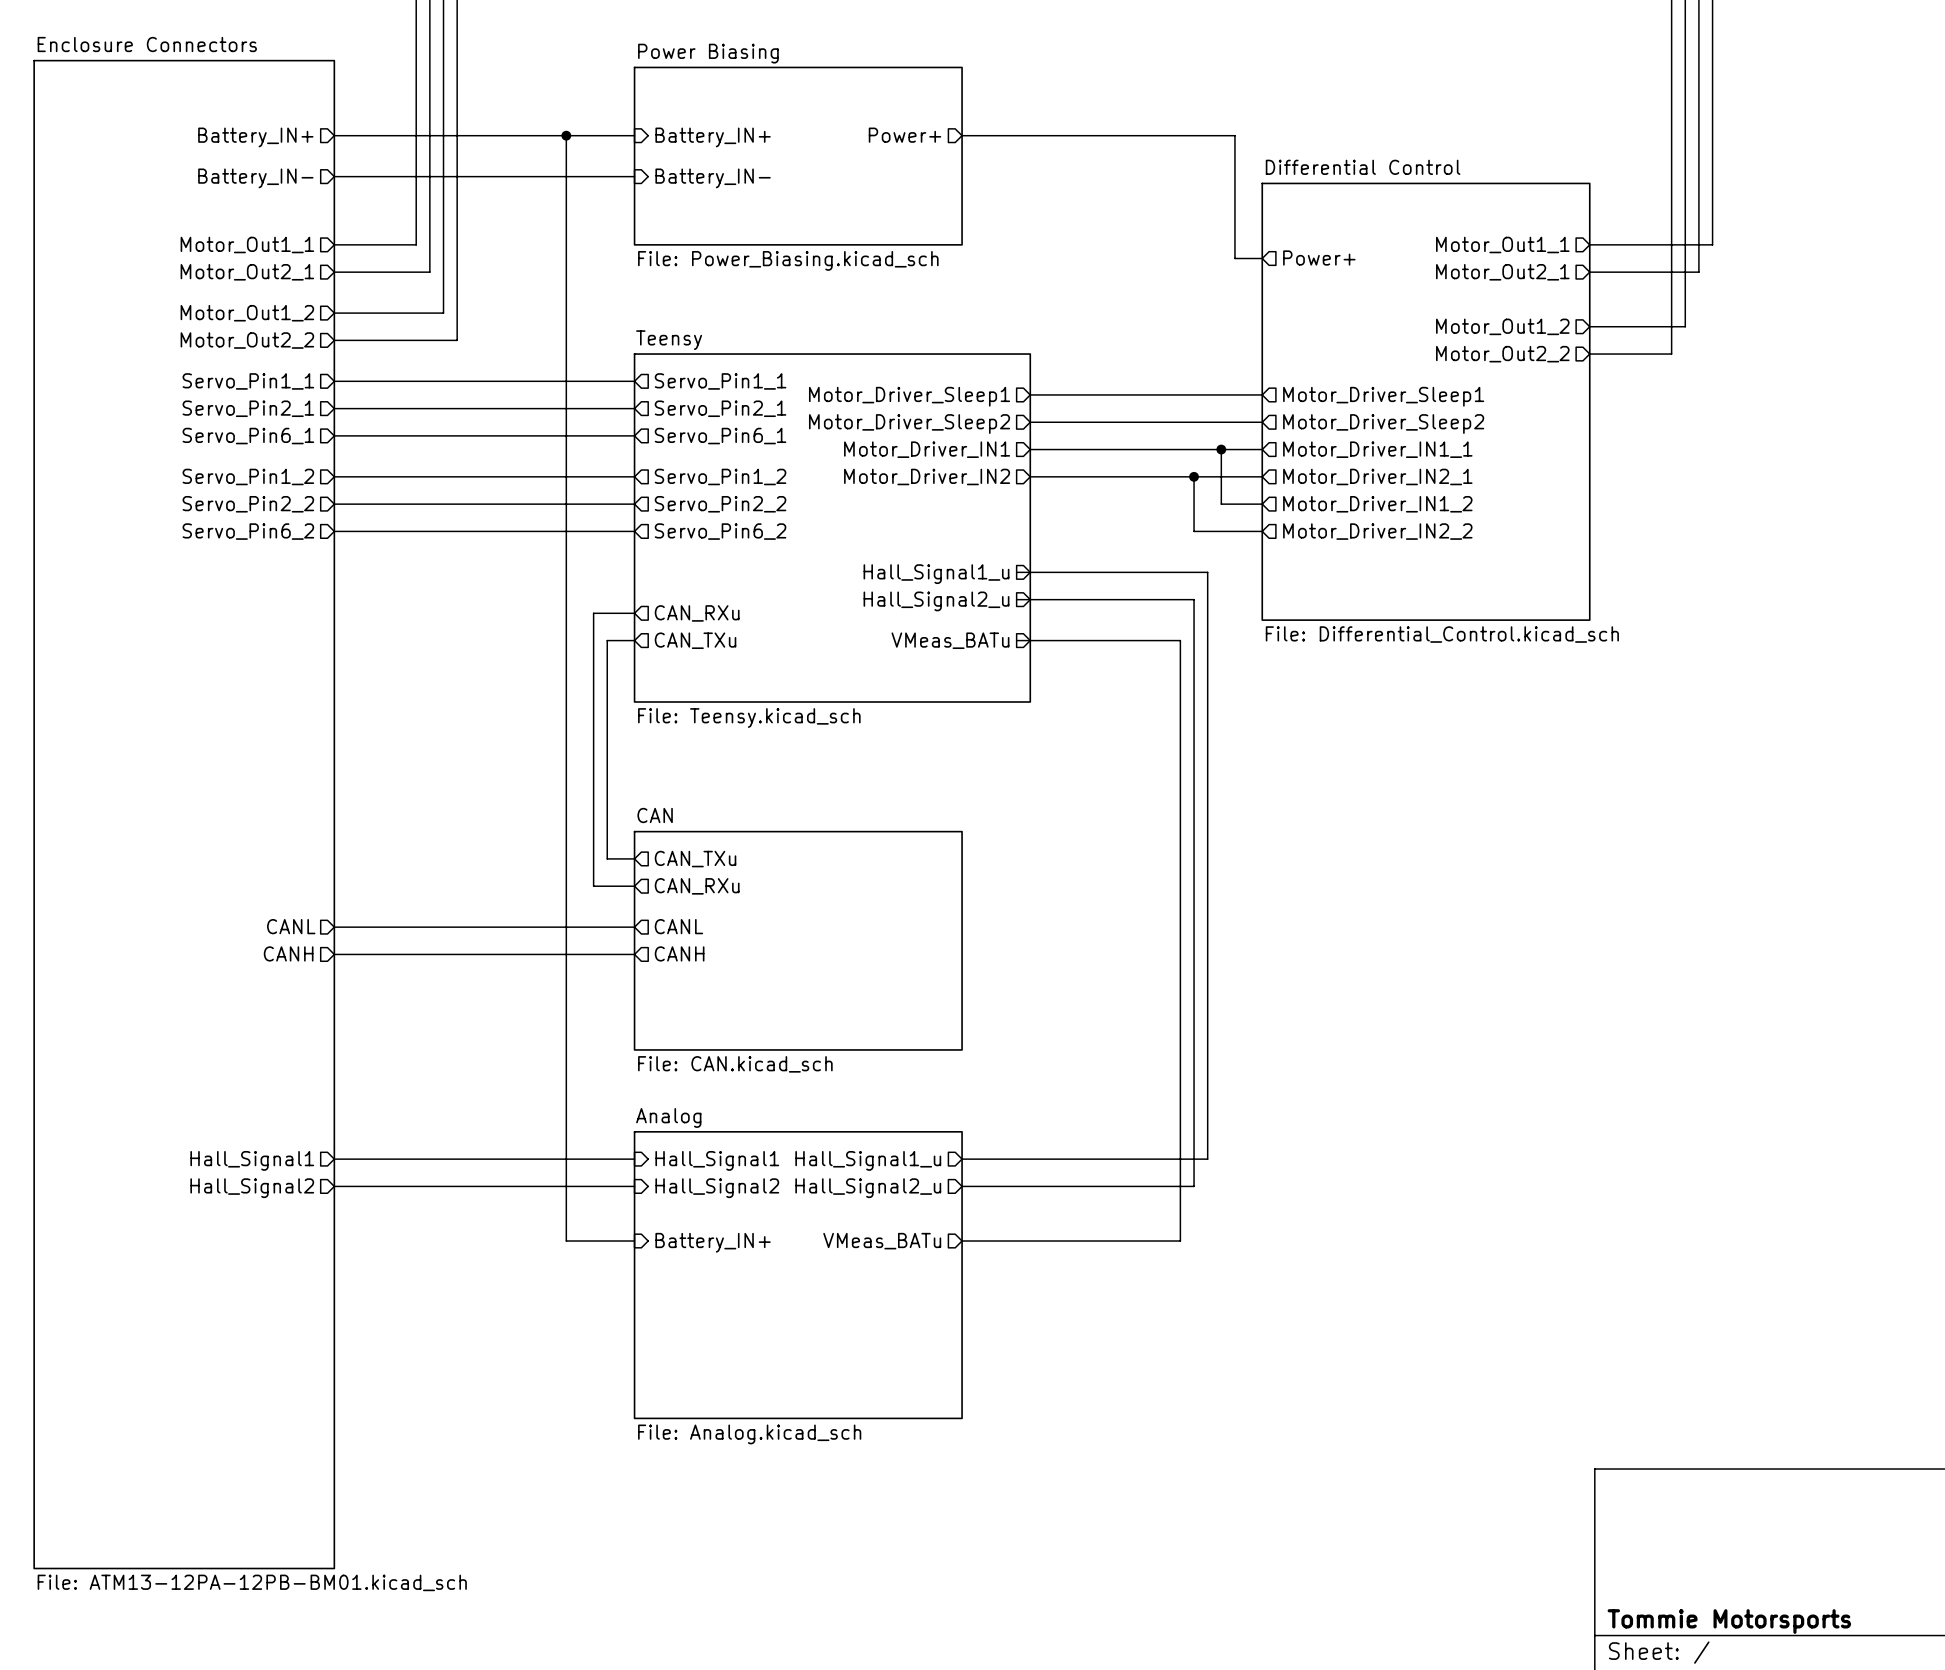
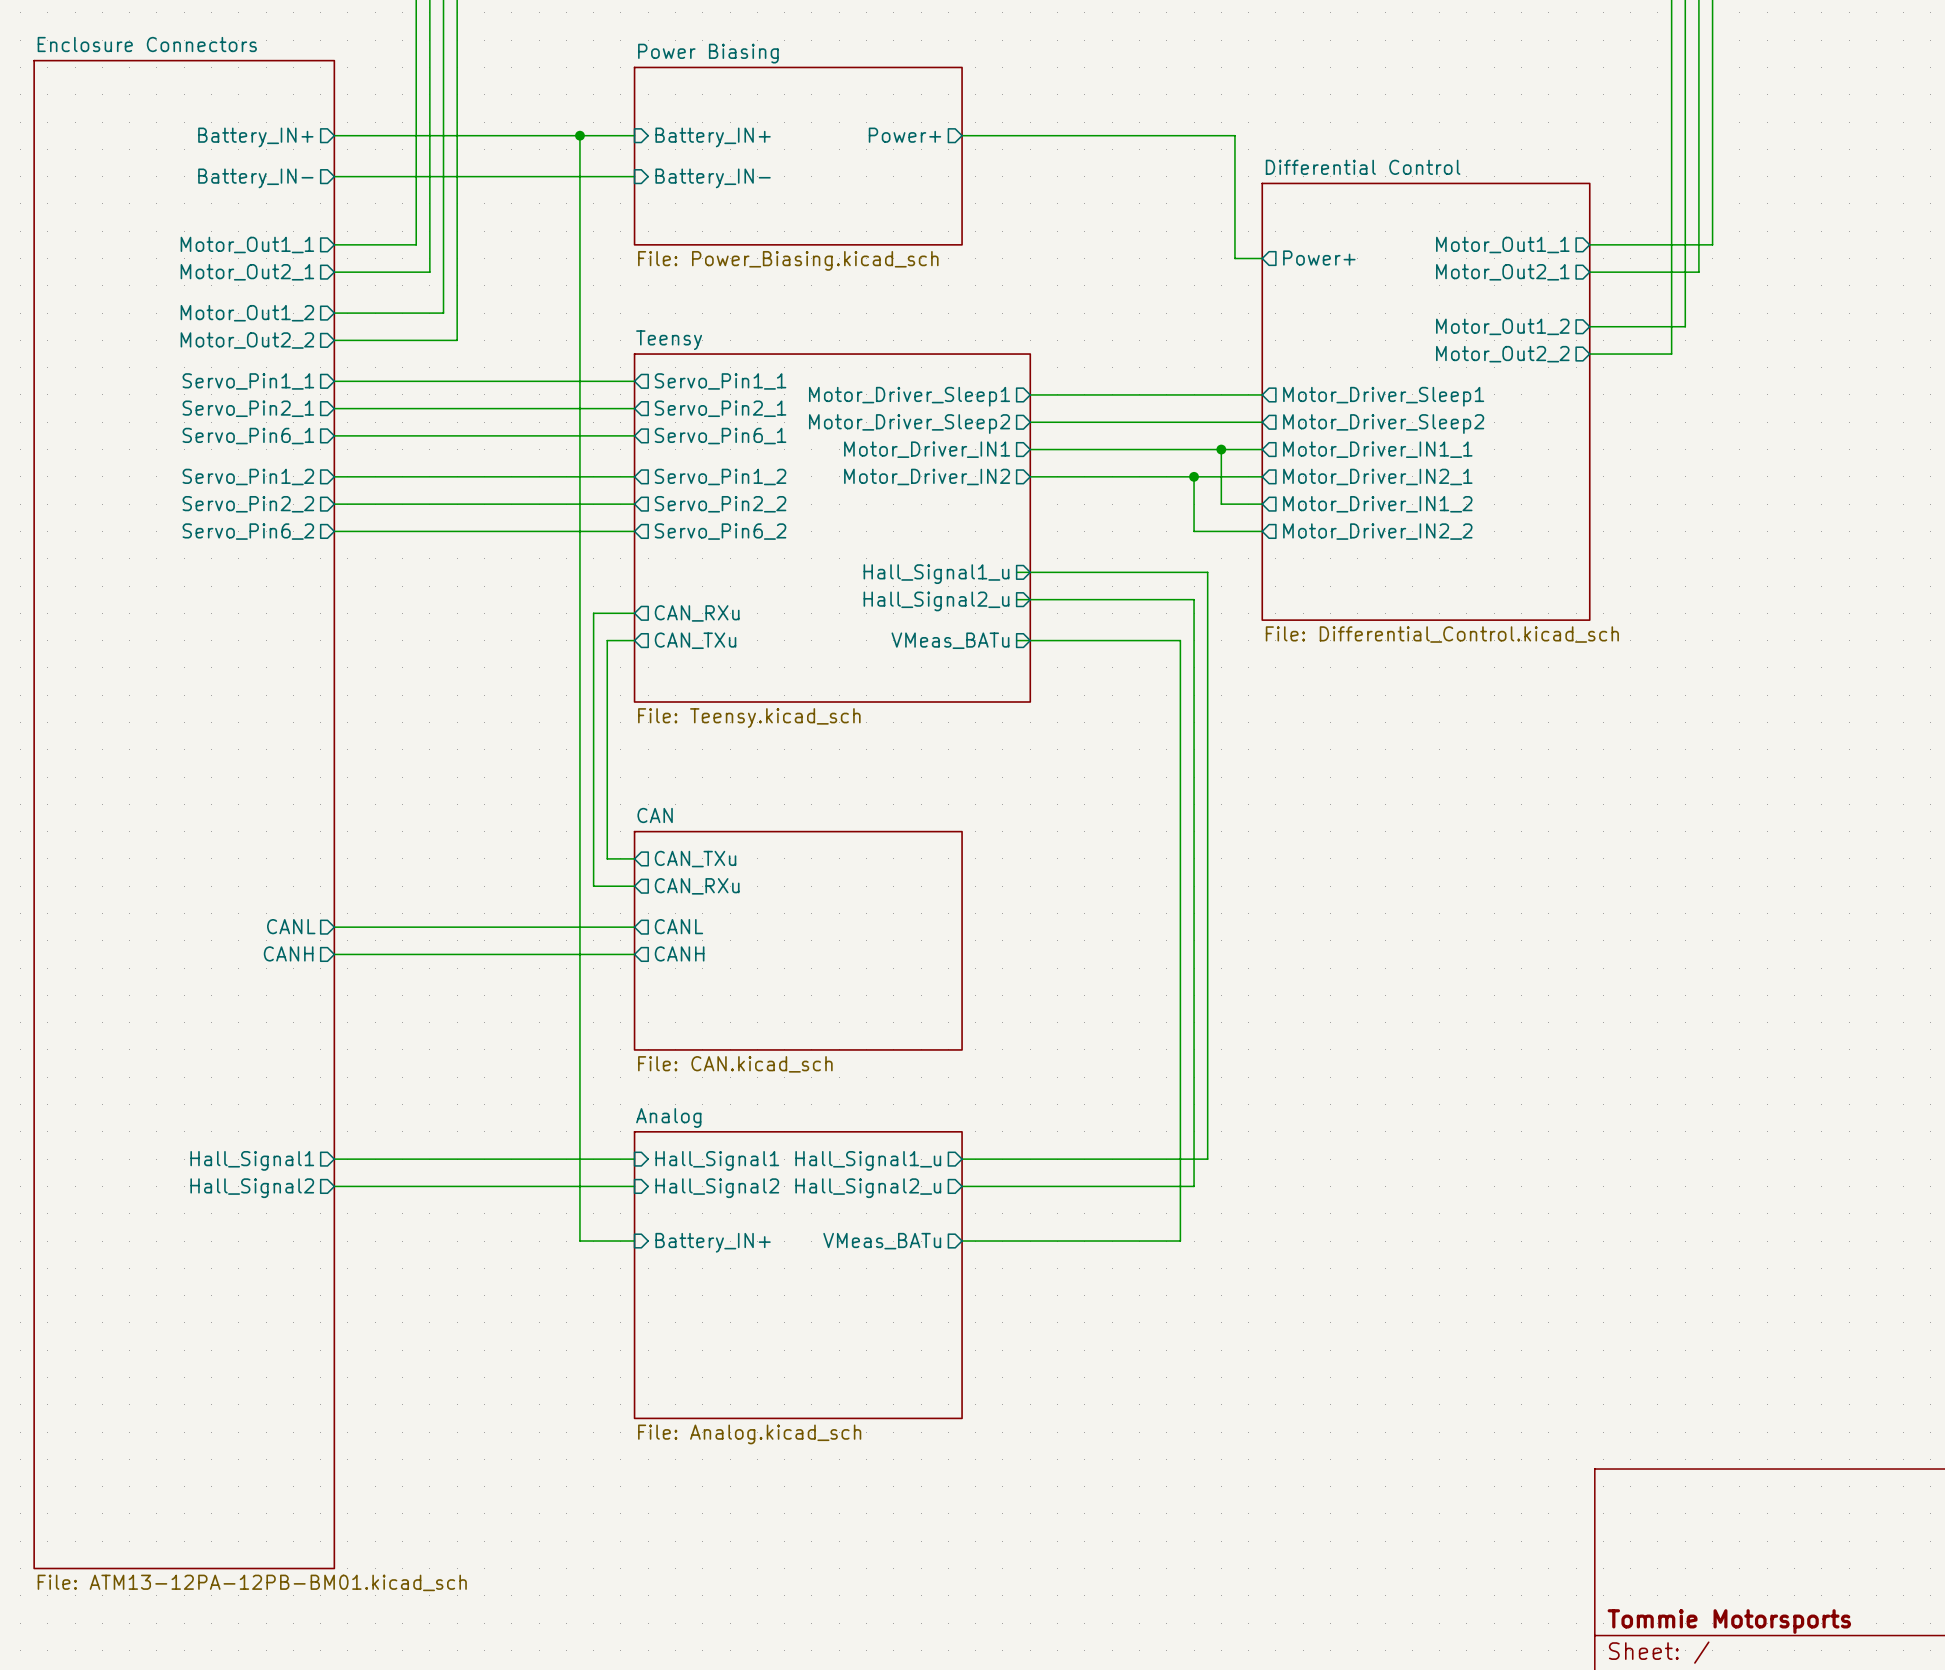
wire: (566, 135) (566, 1241) (579, 1241) -> (579, 135) (579, 1241)
junction position: (566, 135) -> (579, 135)

